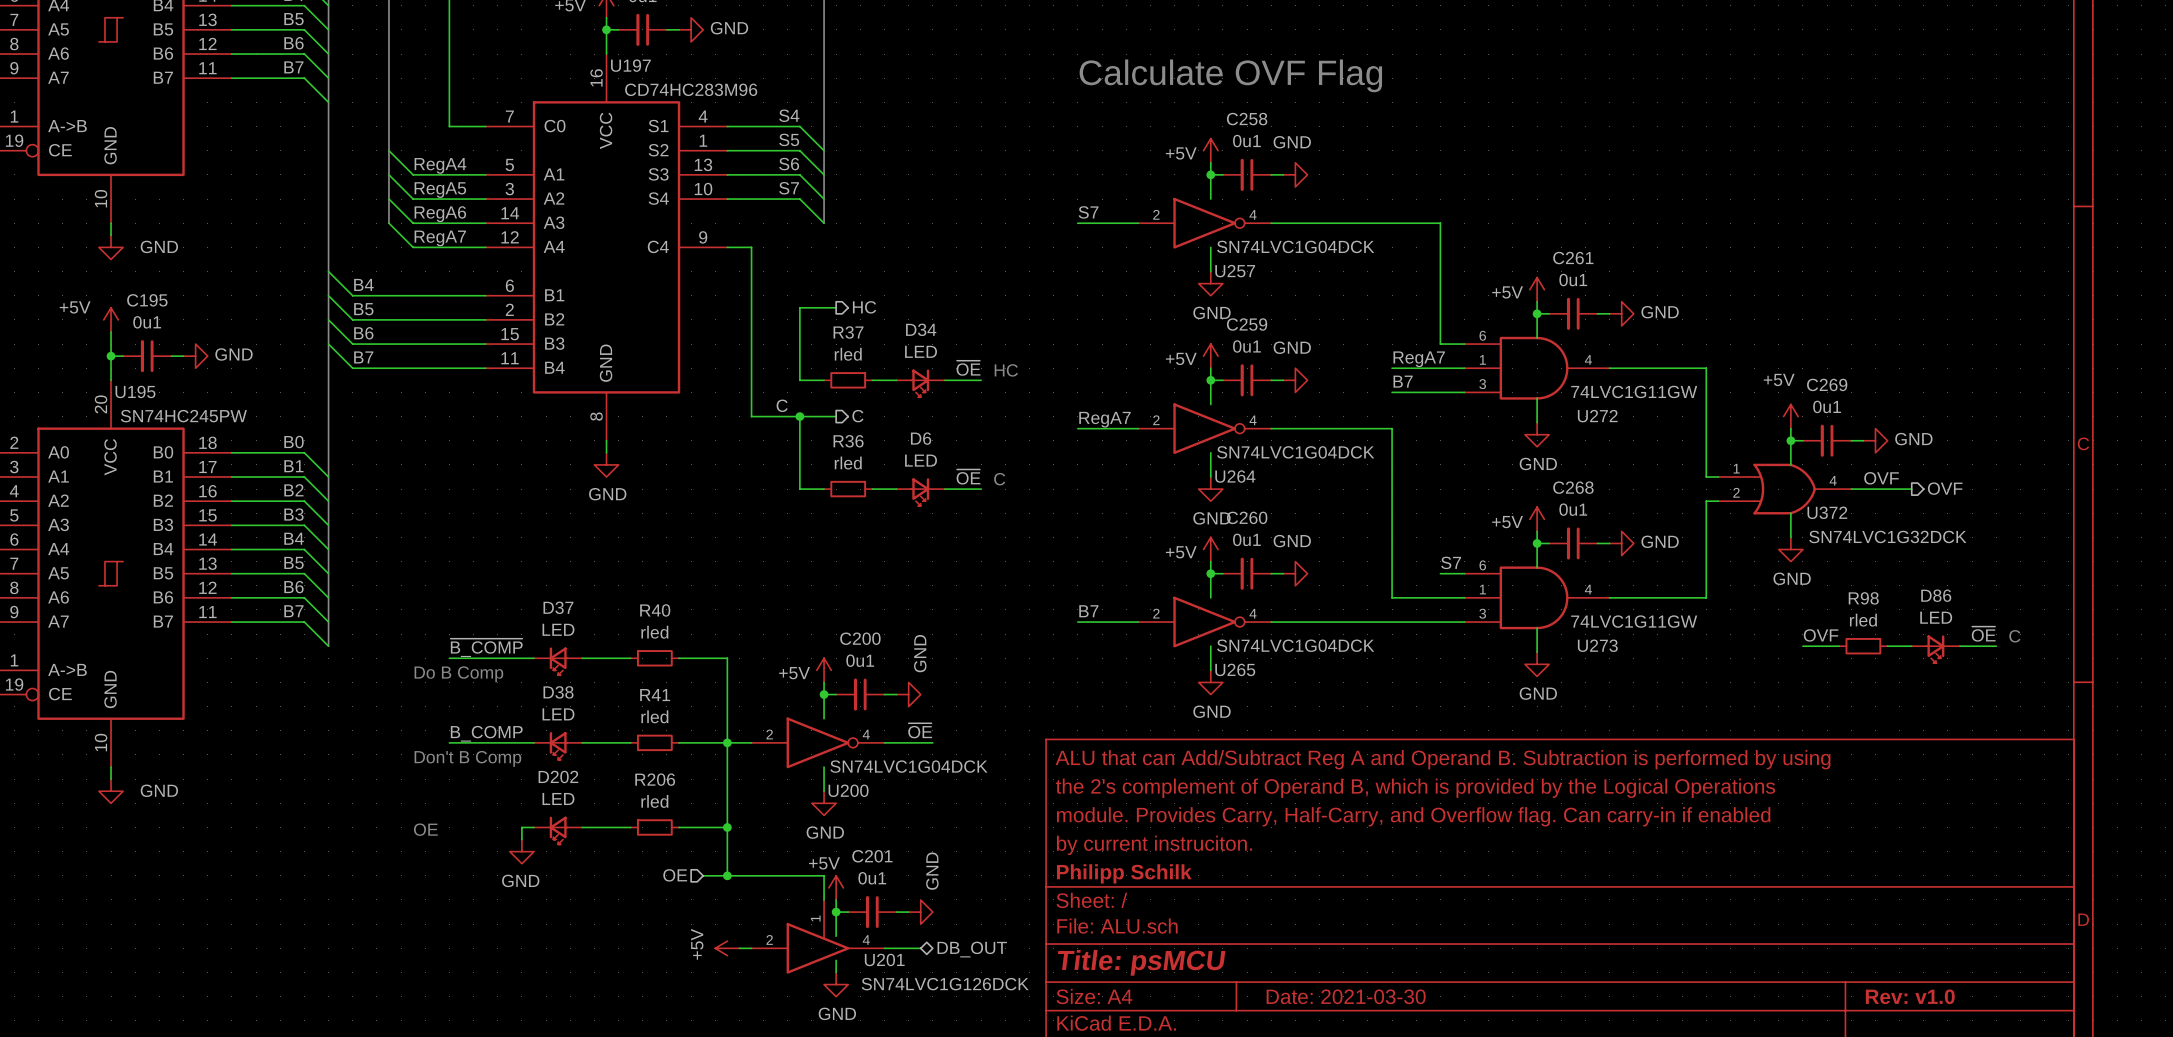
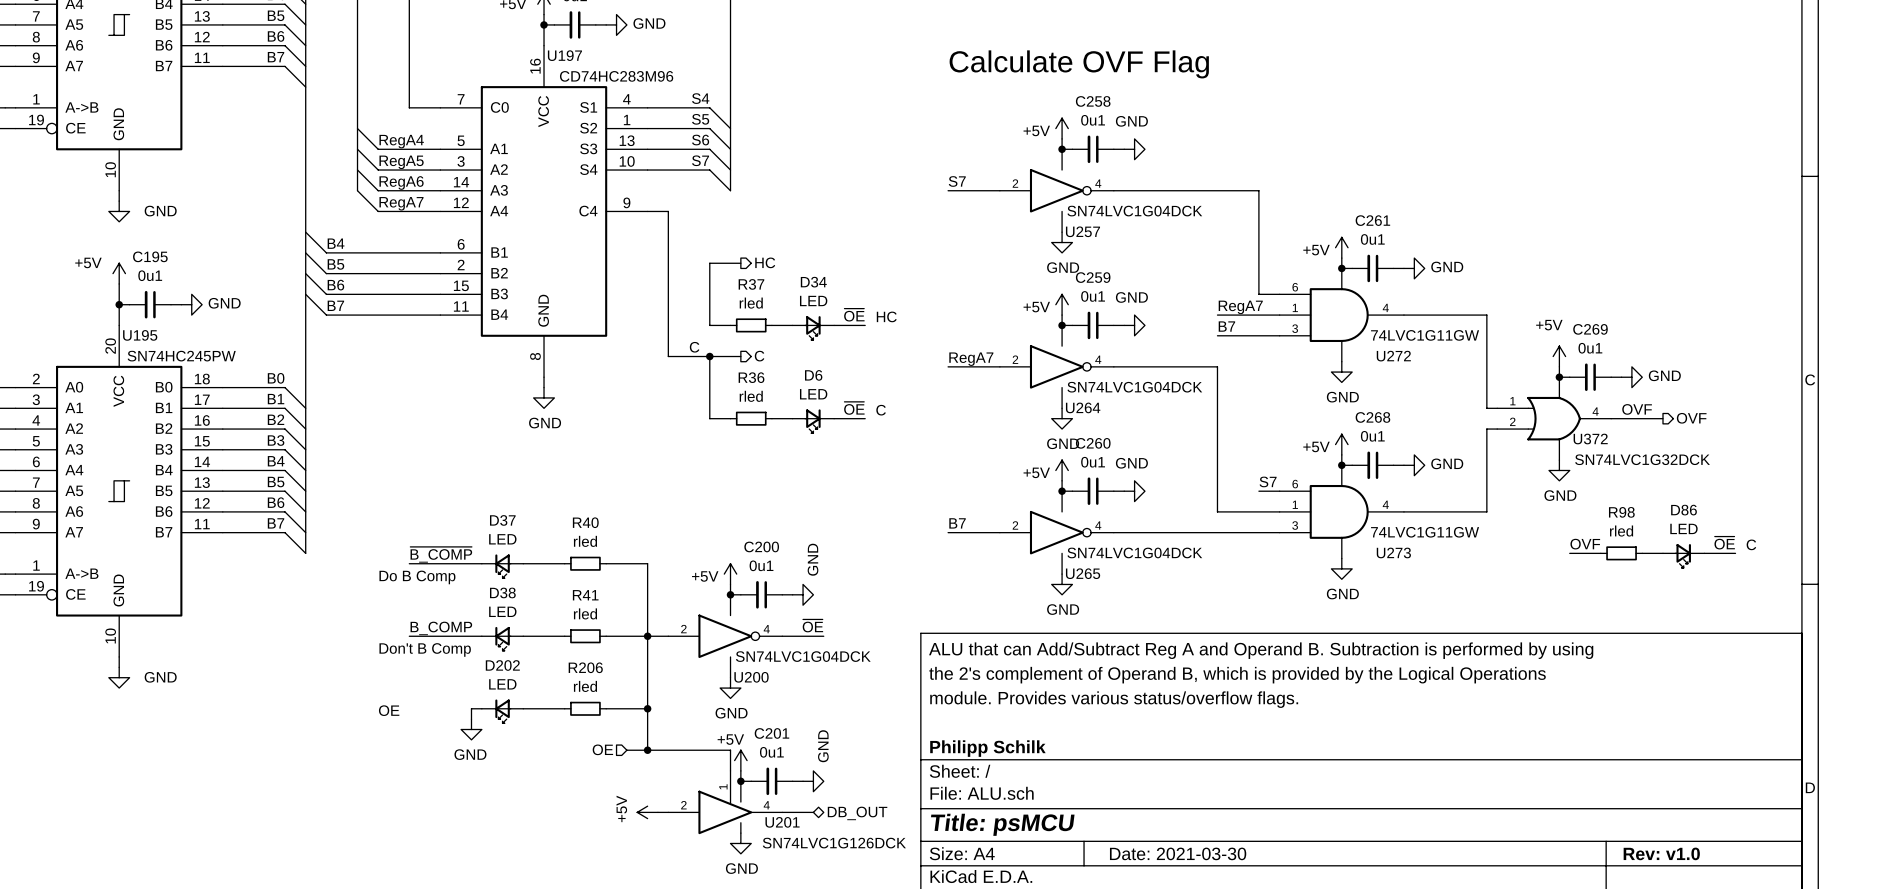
title block: module. Provides Carry, Half-Carry, and Overflow flag. Can carry-in if enabled (1413, 816) -> module. Provides various status/overflow flags. (1114, 699)
title block: by current instruciton. (1154, 845) -> none

